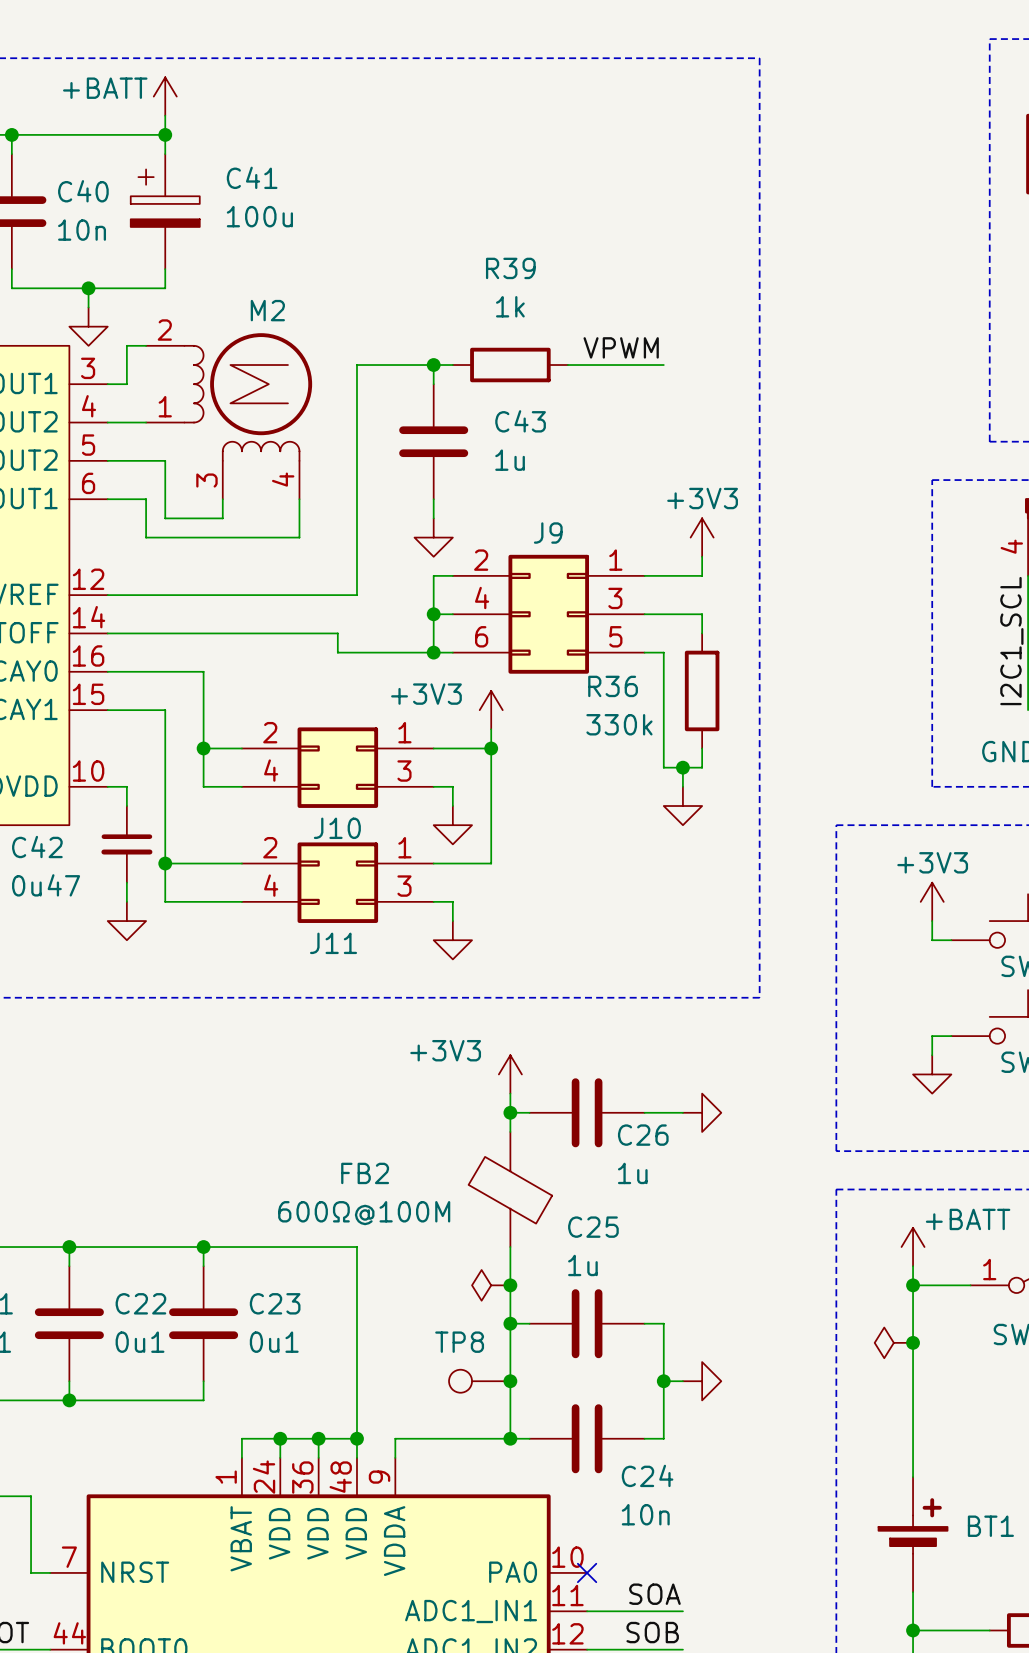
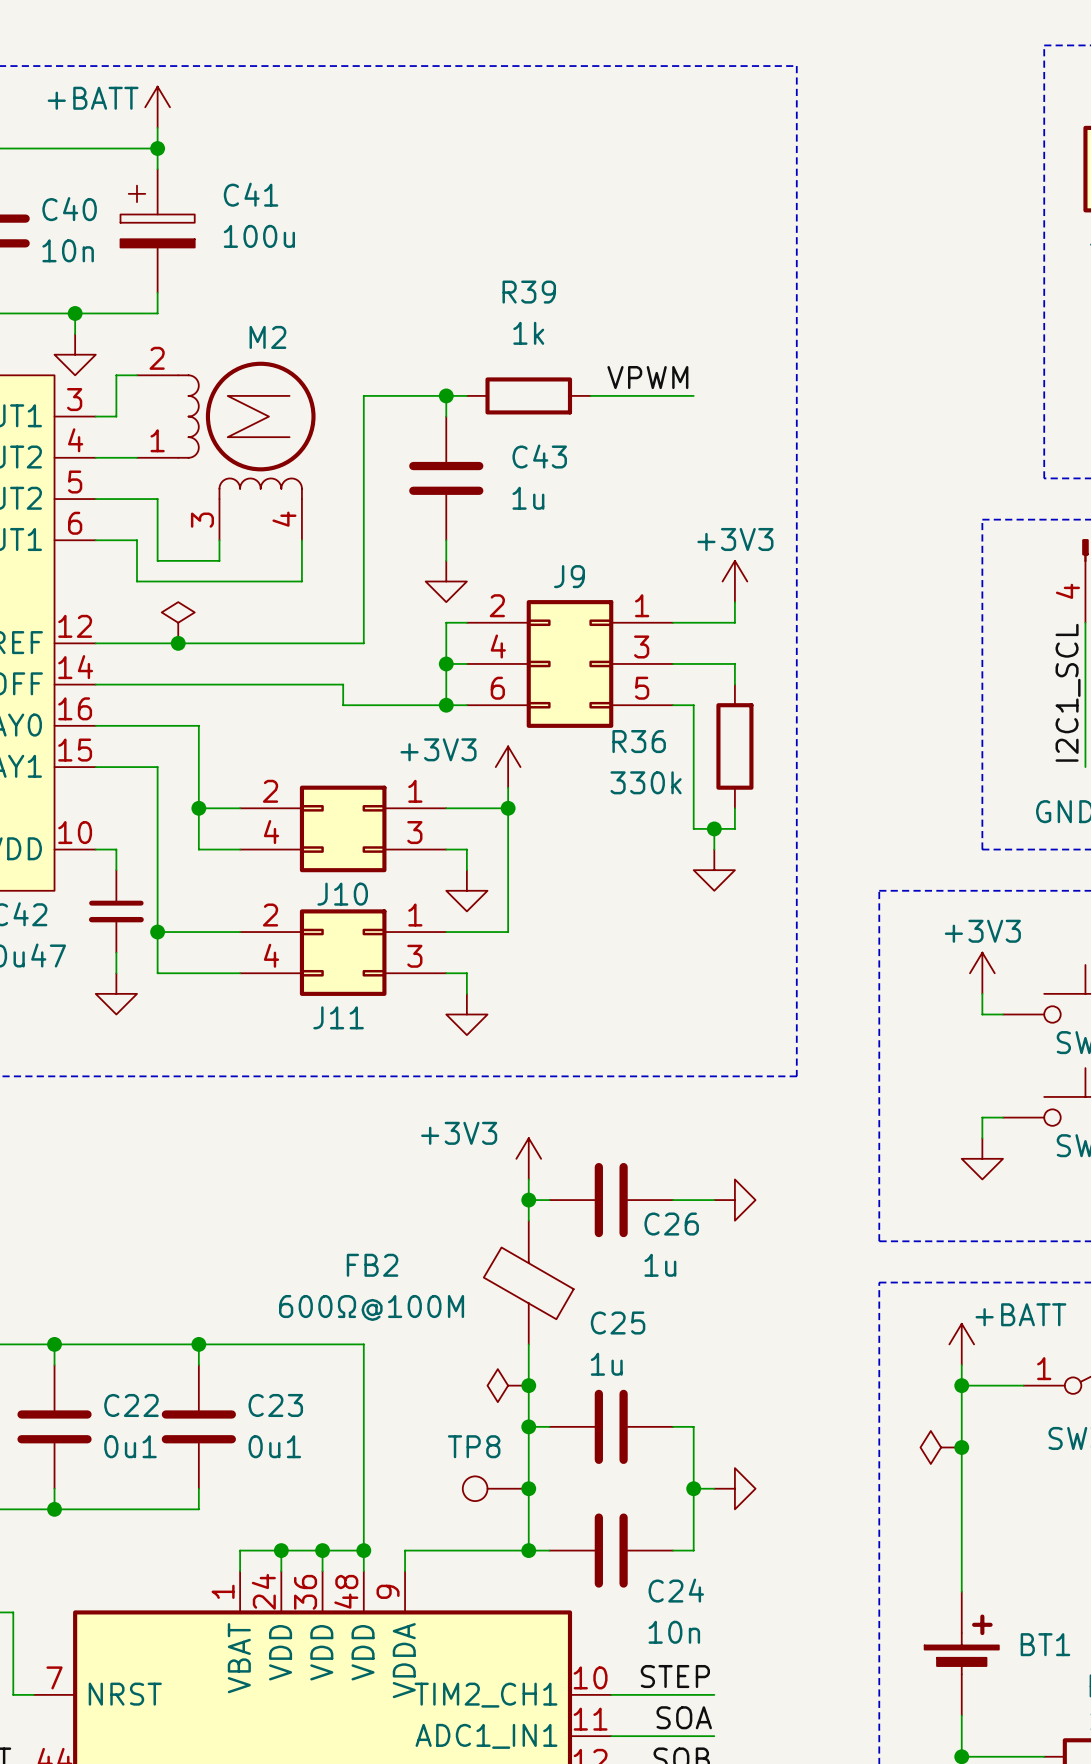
power symbol: none -> (178, 622)
junction: none -> (178, 643)
label: none -> STEP (675, 1676)
part pin name: PA0 (513, 1572) -> TIM2_CH1 (485, 1695)
wire: none -> (611, 1694) (714, 1694)
no-connect mark: (587, 1572) -> none

